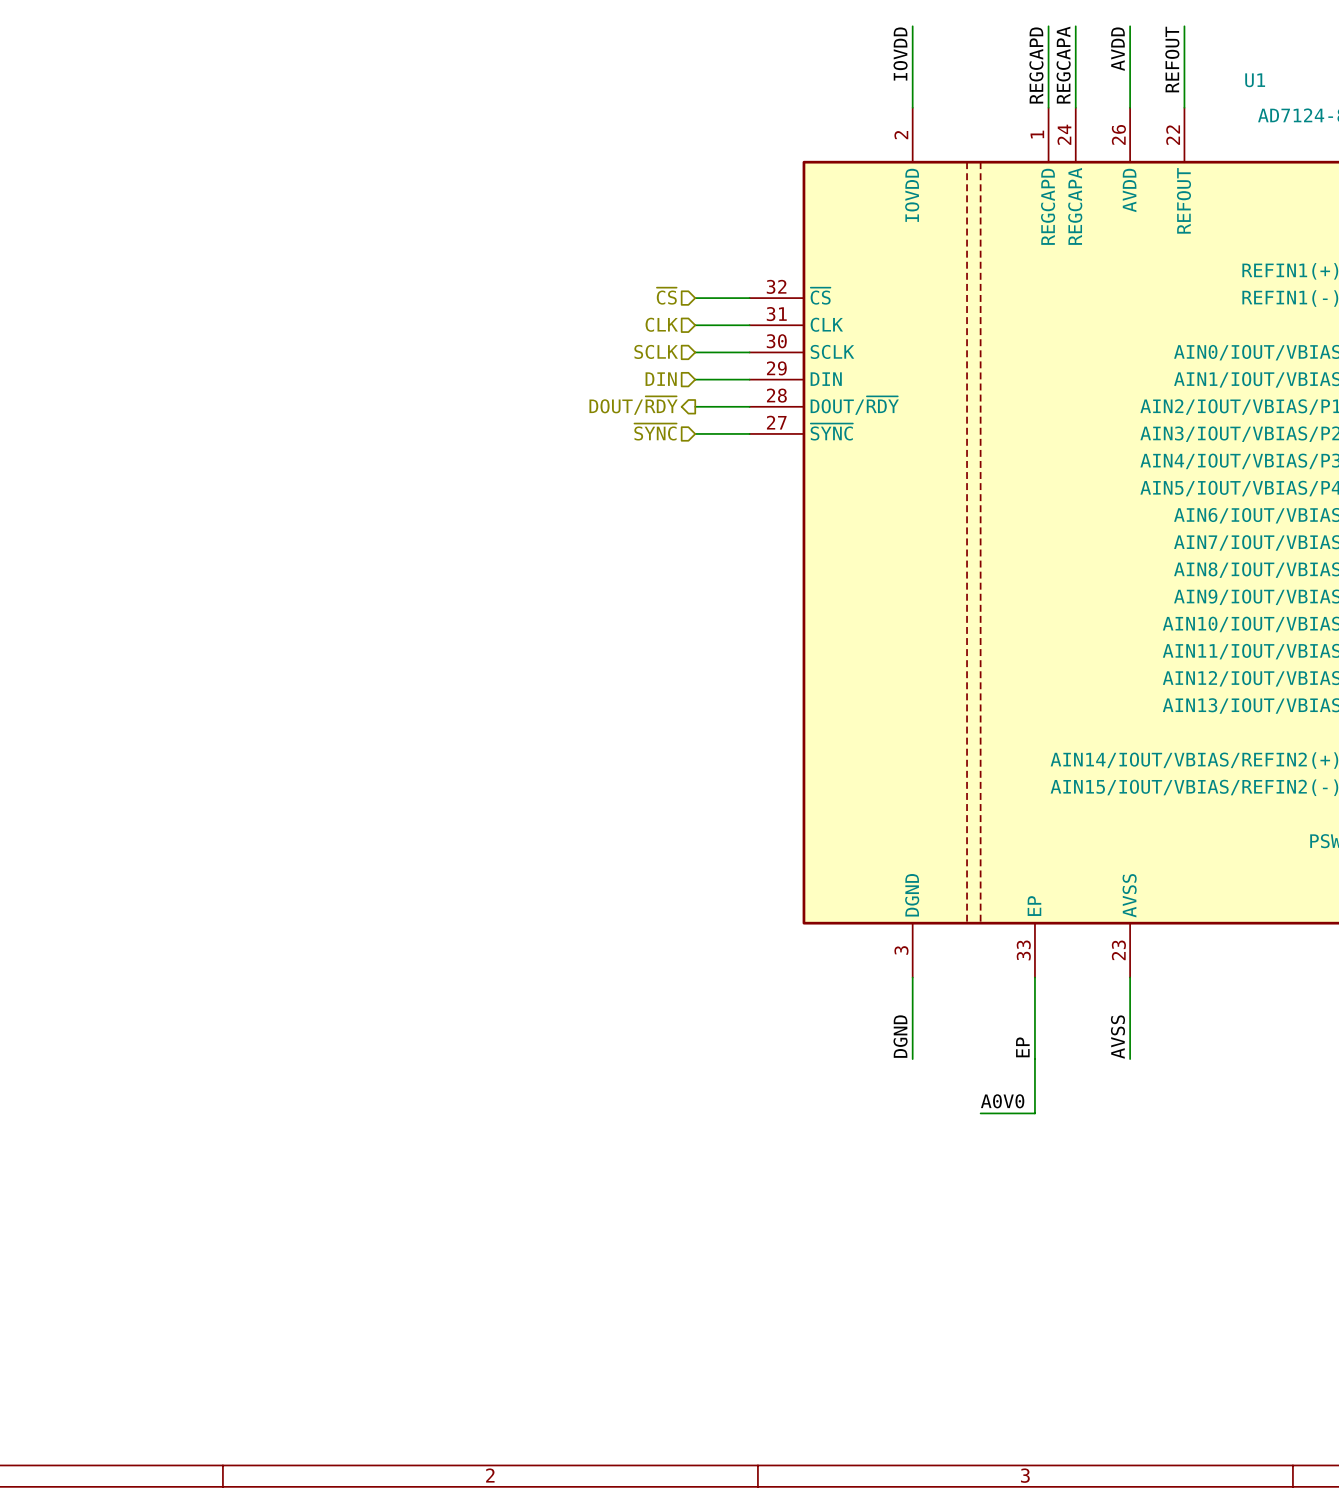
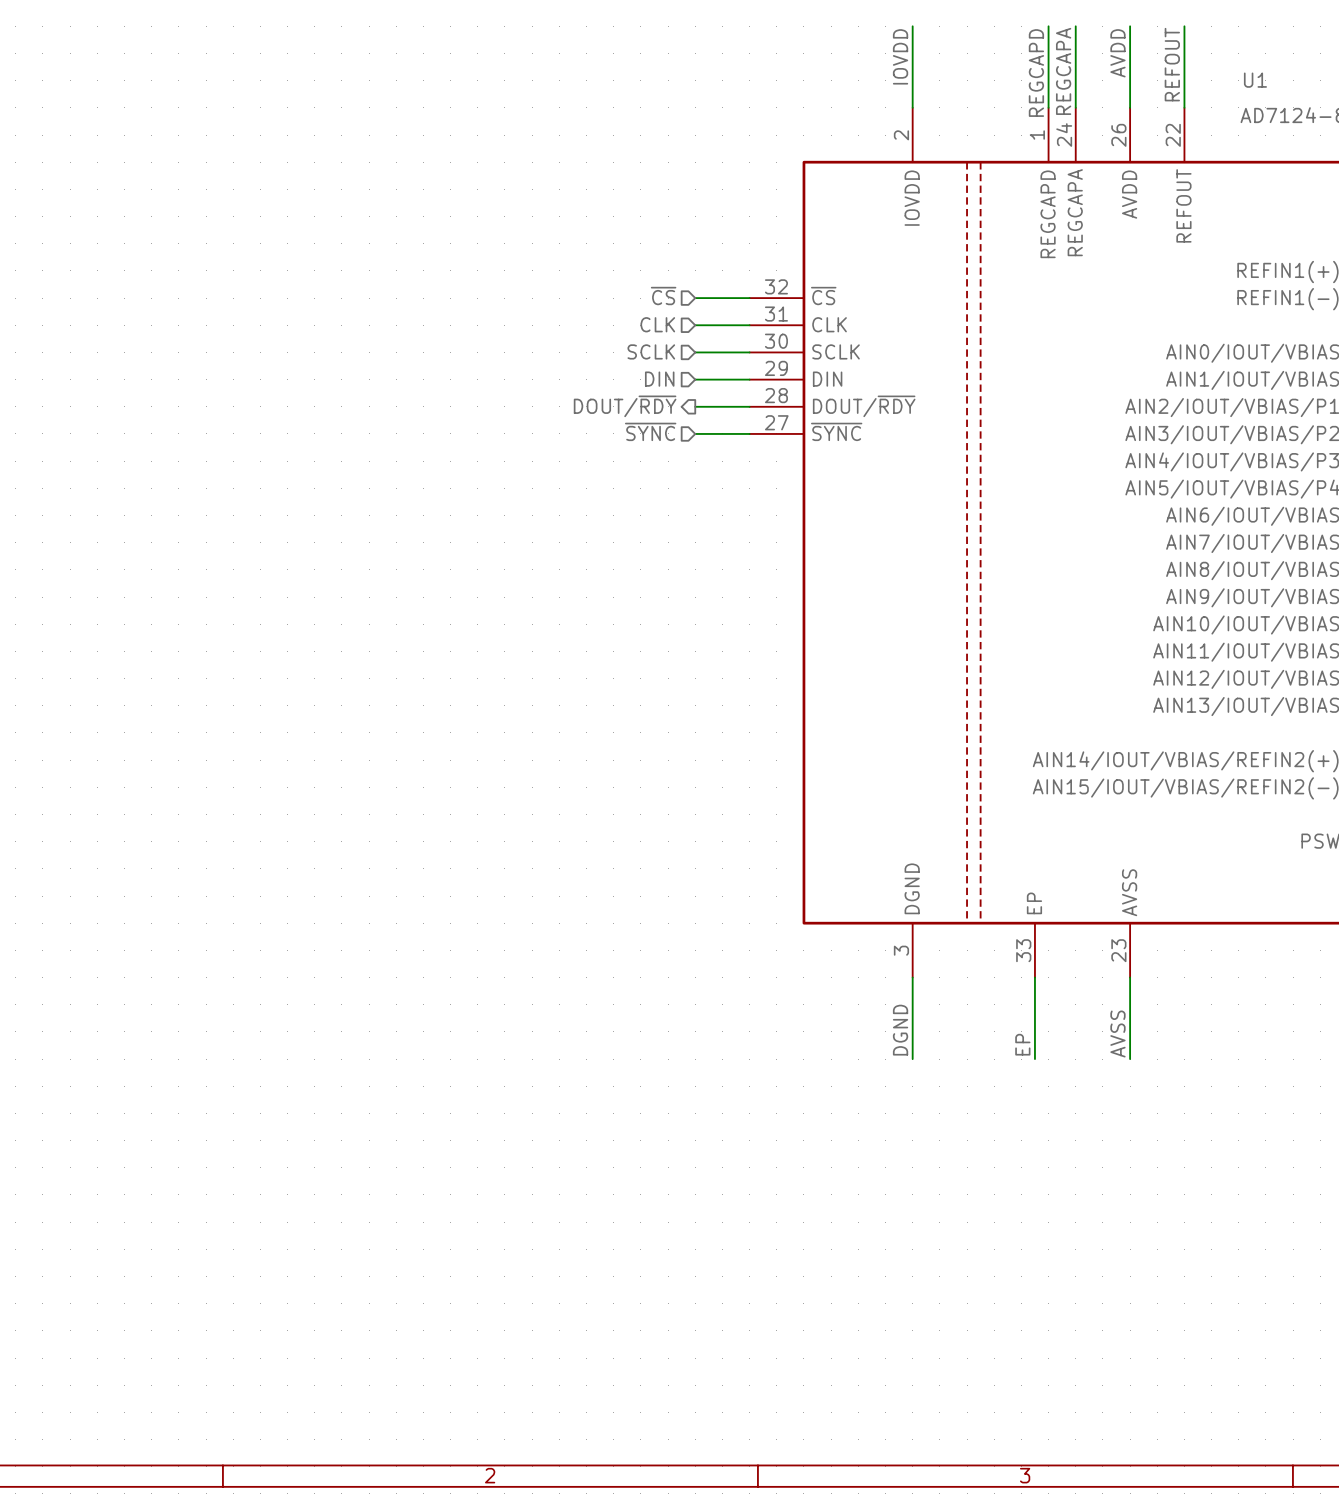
wire: (1034, 1059) (1034, 1113) (980, 1113) -> none
label: A0V0 (1002, 1101) -> none

